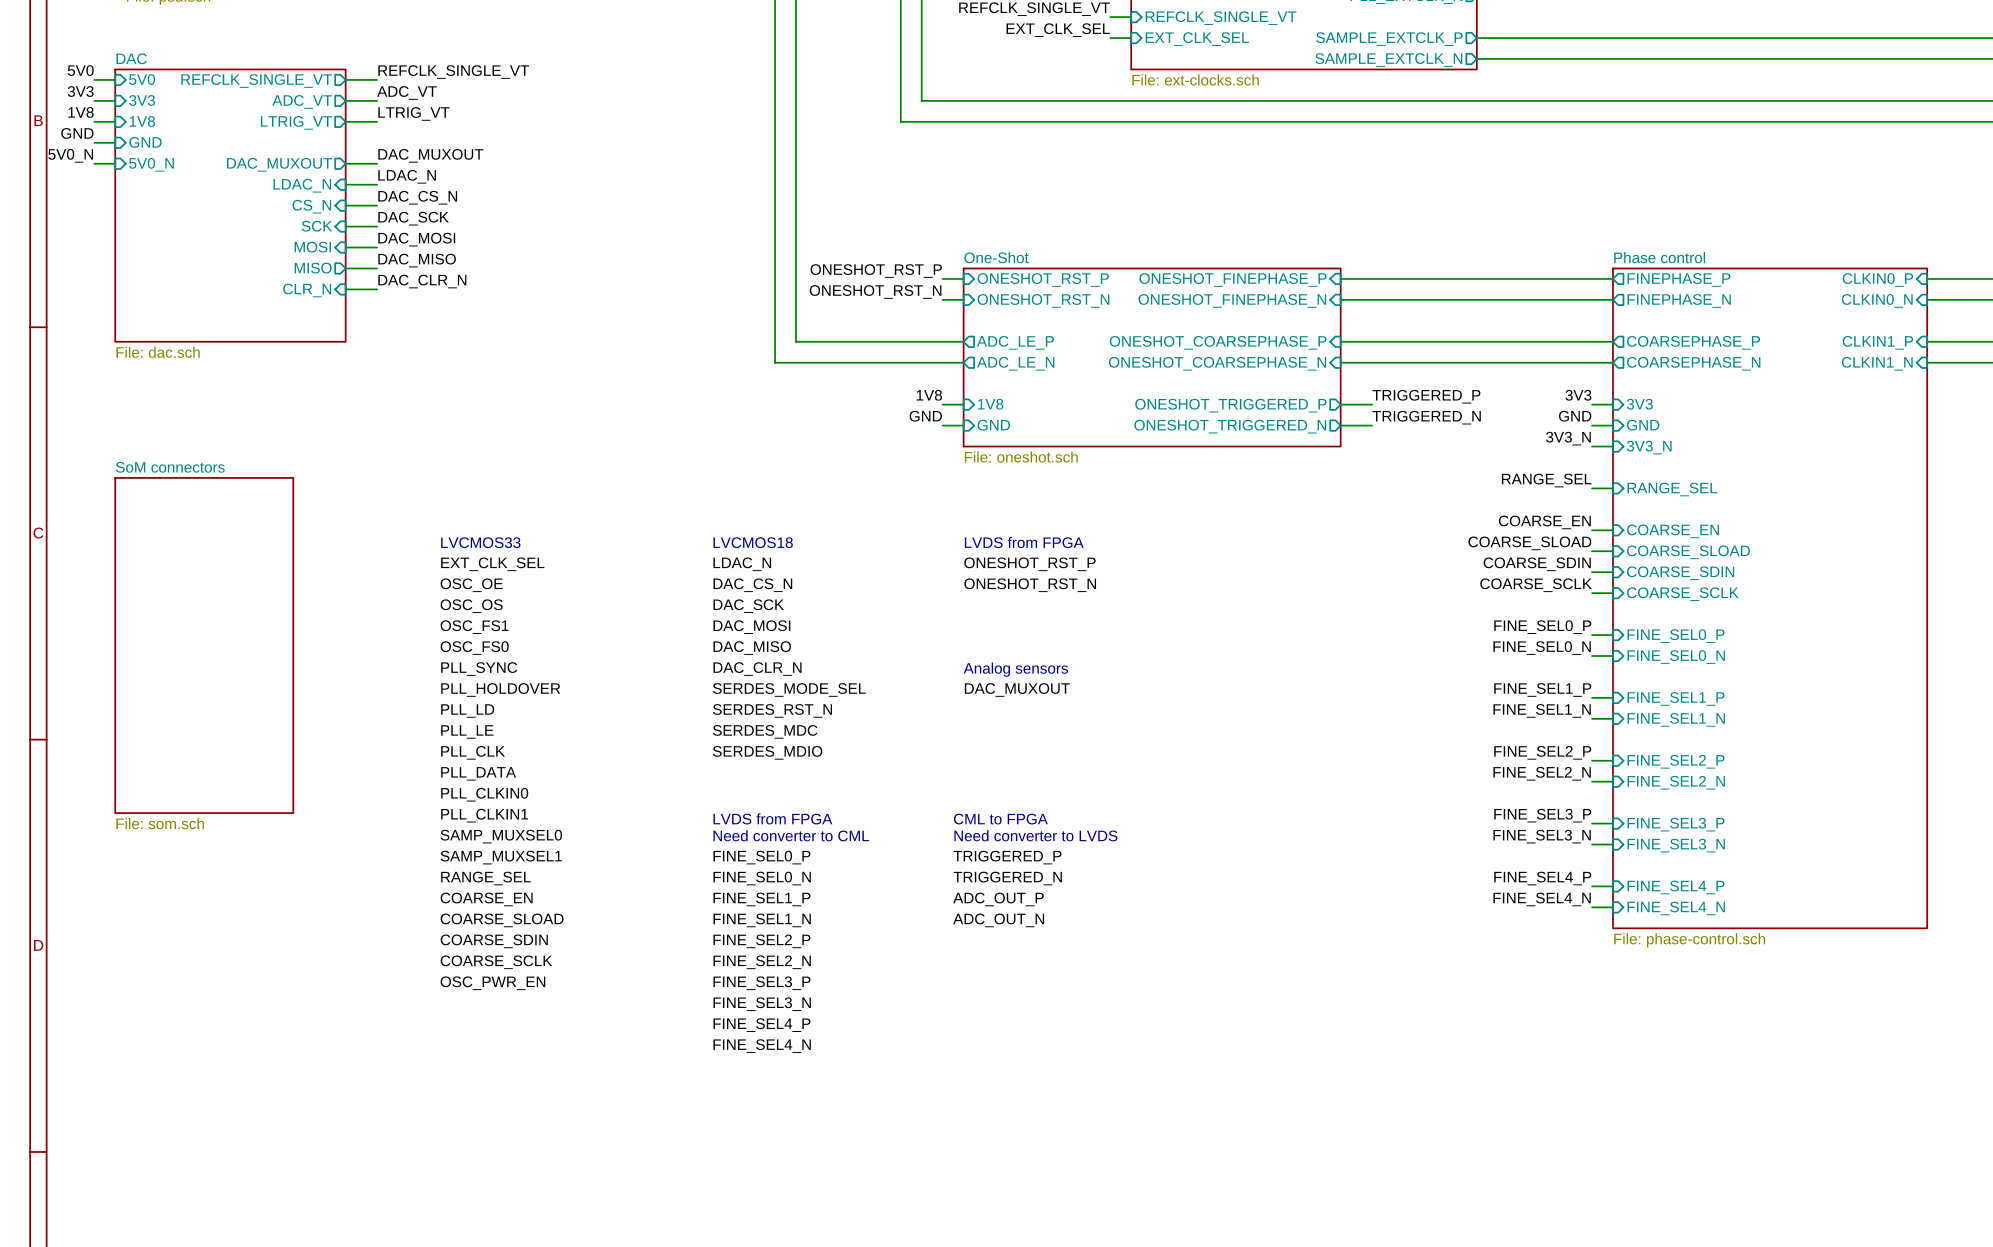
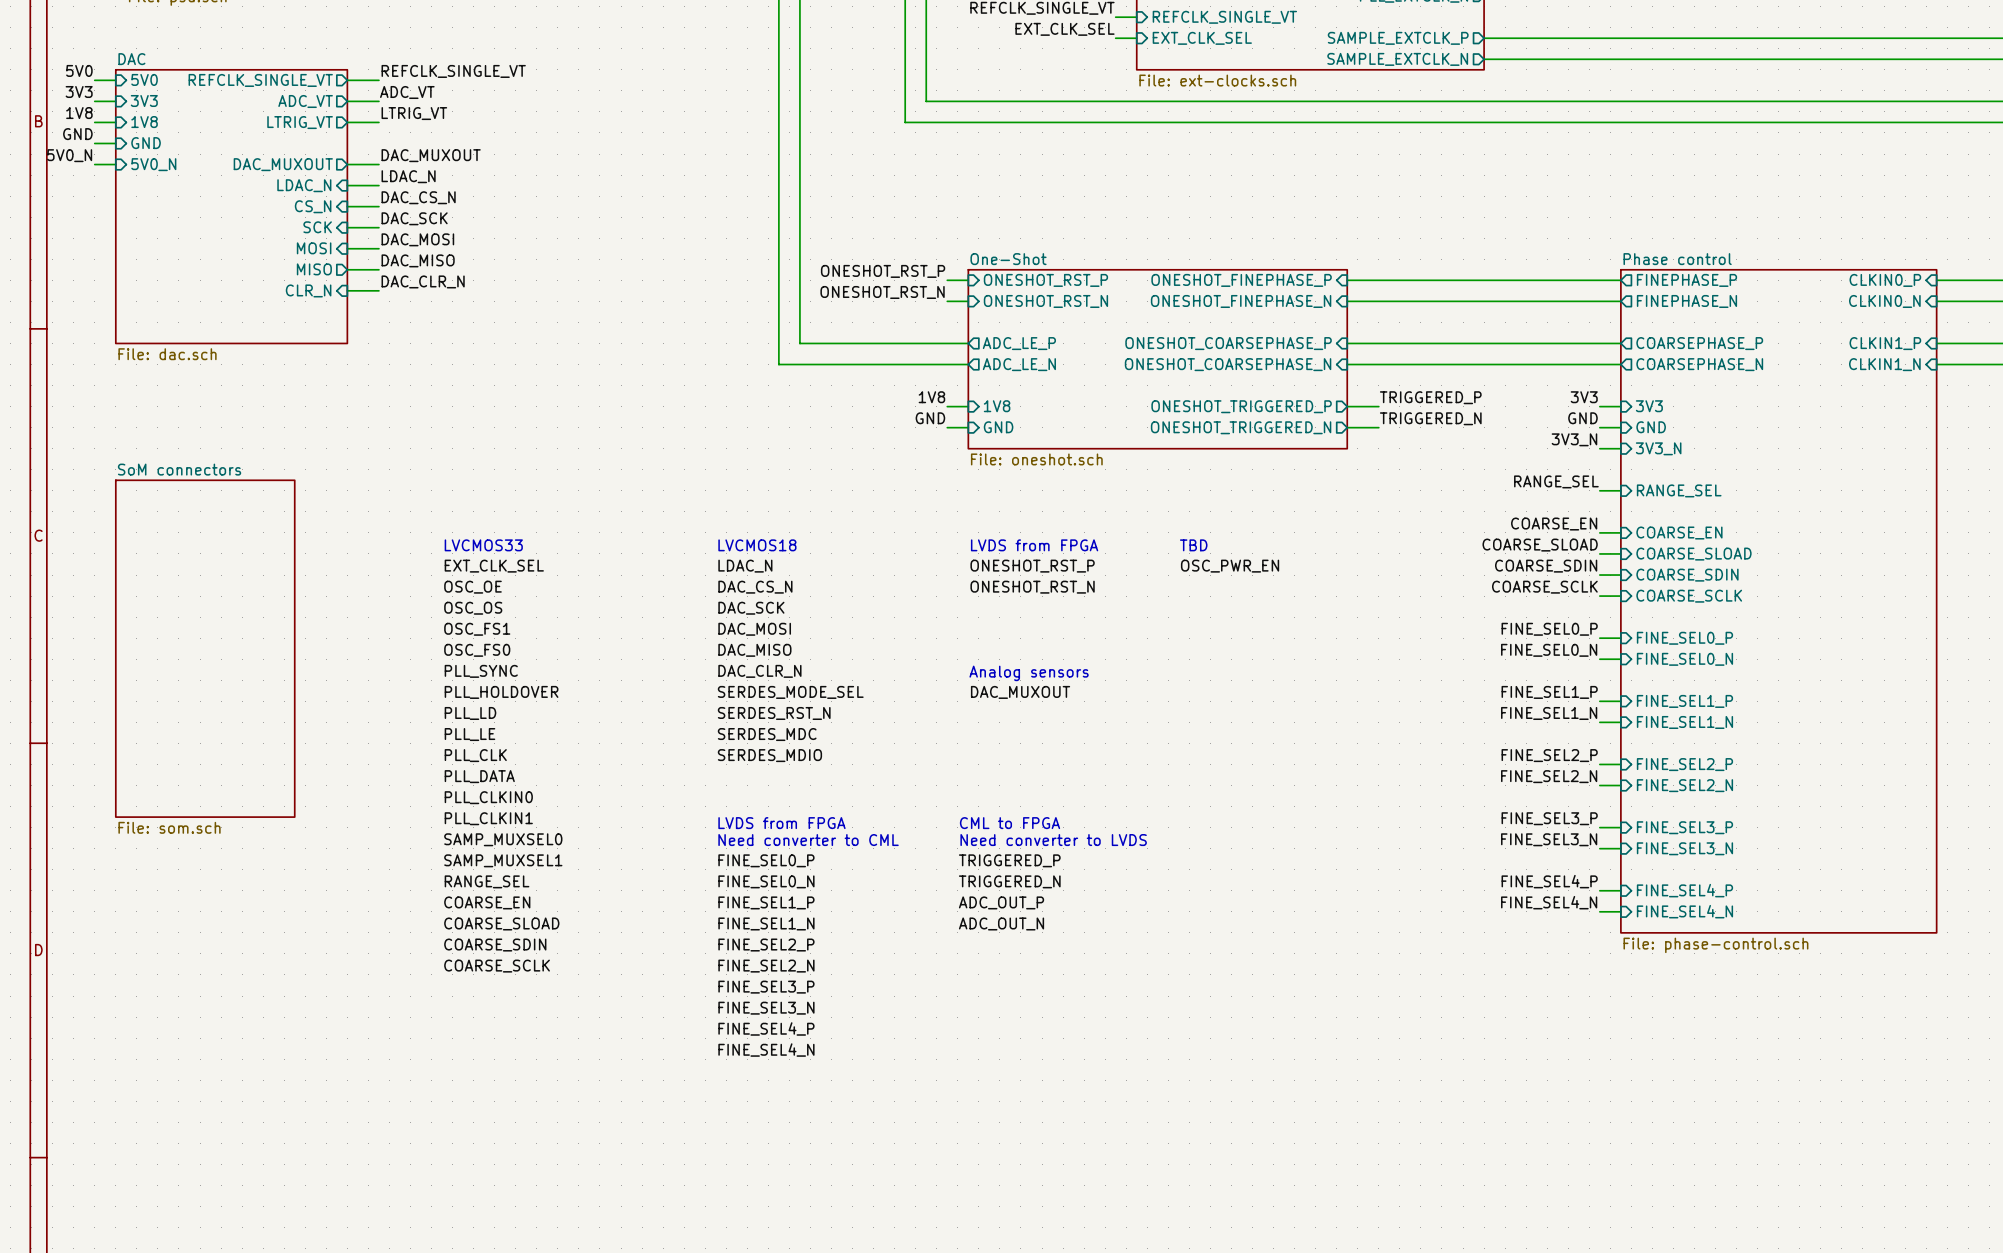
text: none -> TBD (1193, 545)
label: none -> OSC_PWR_EN (1230, 566)
label: OSC_PWR_EN (492, 983) -> none

